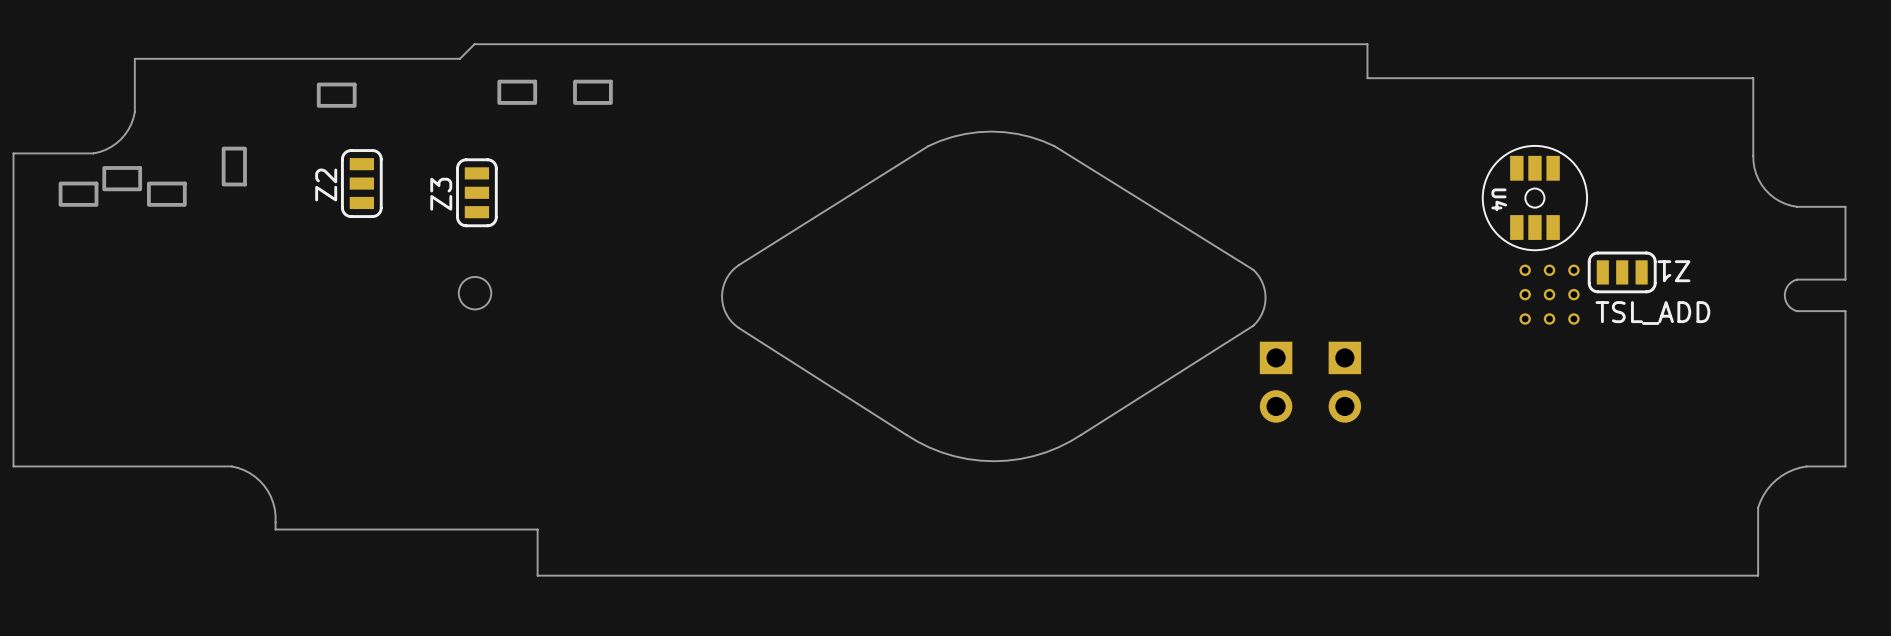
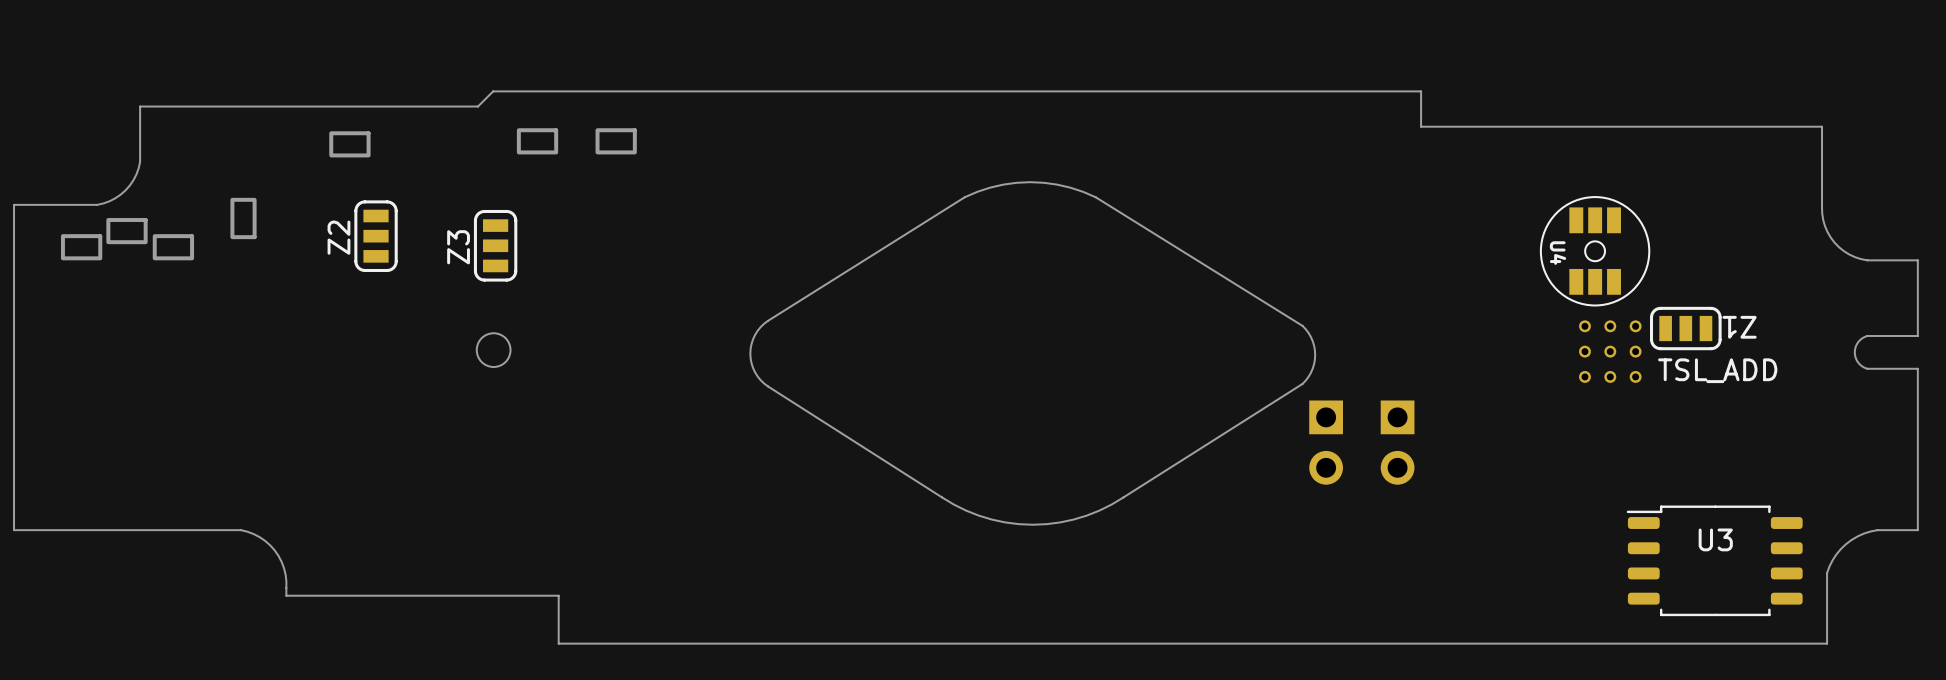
U3: none -> (1714, 560)

